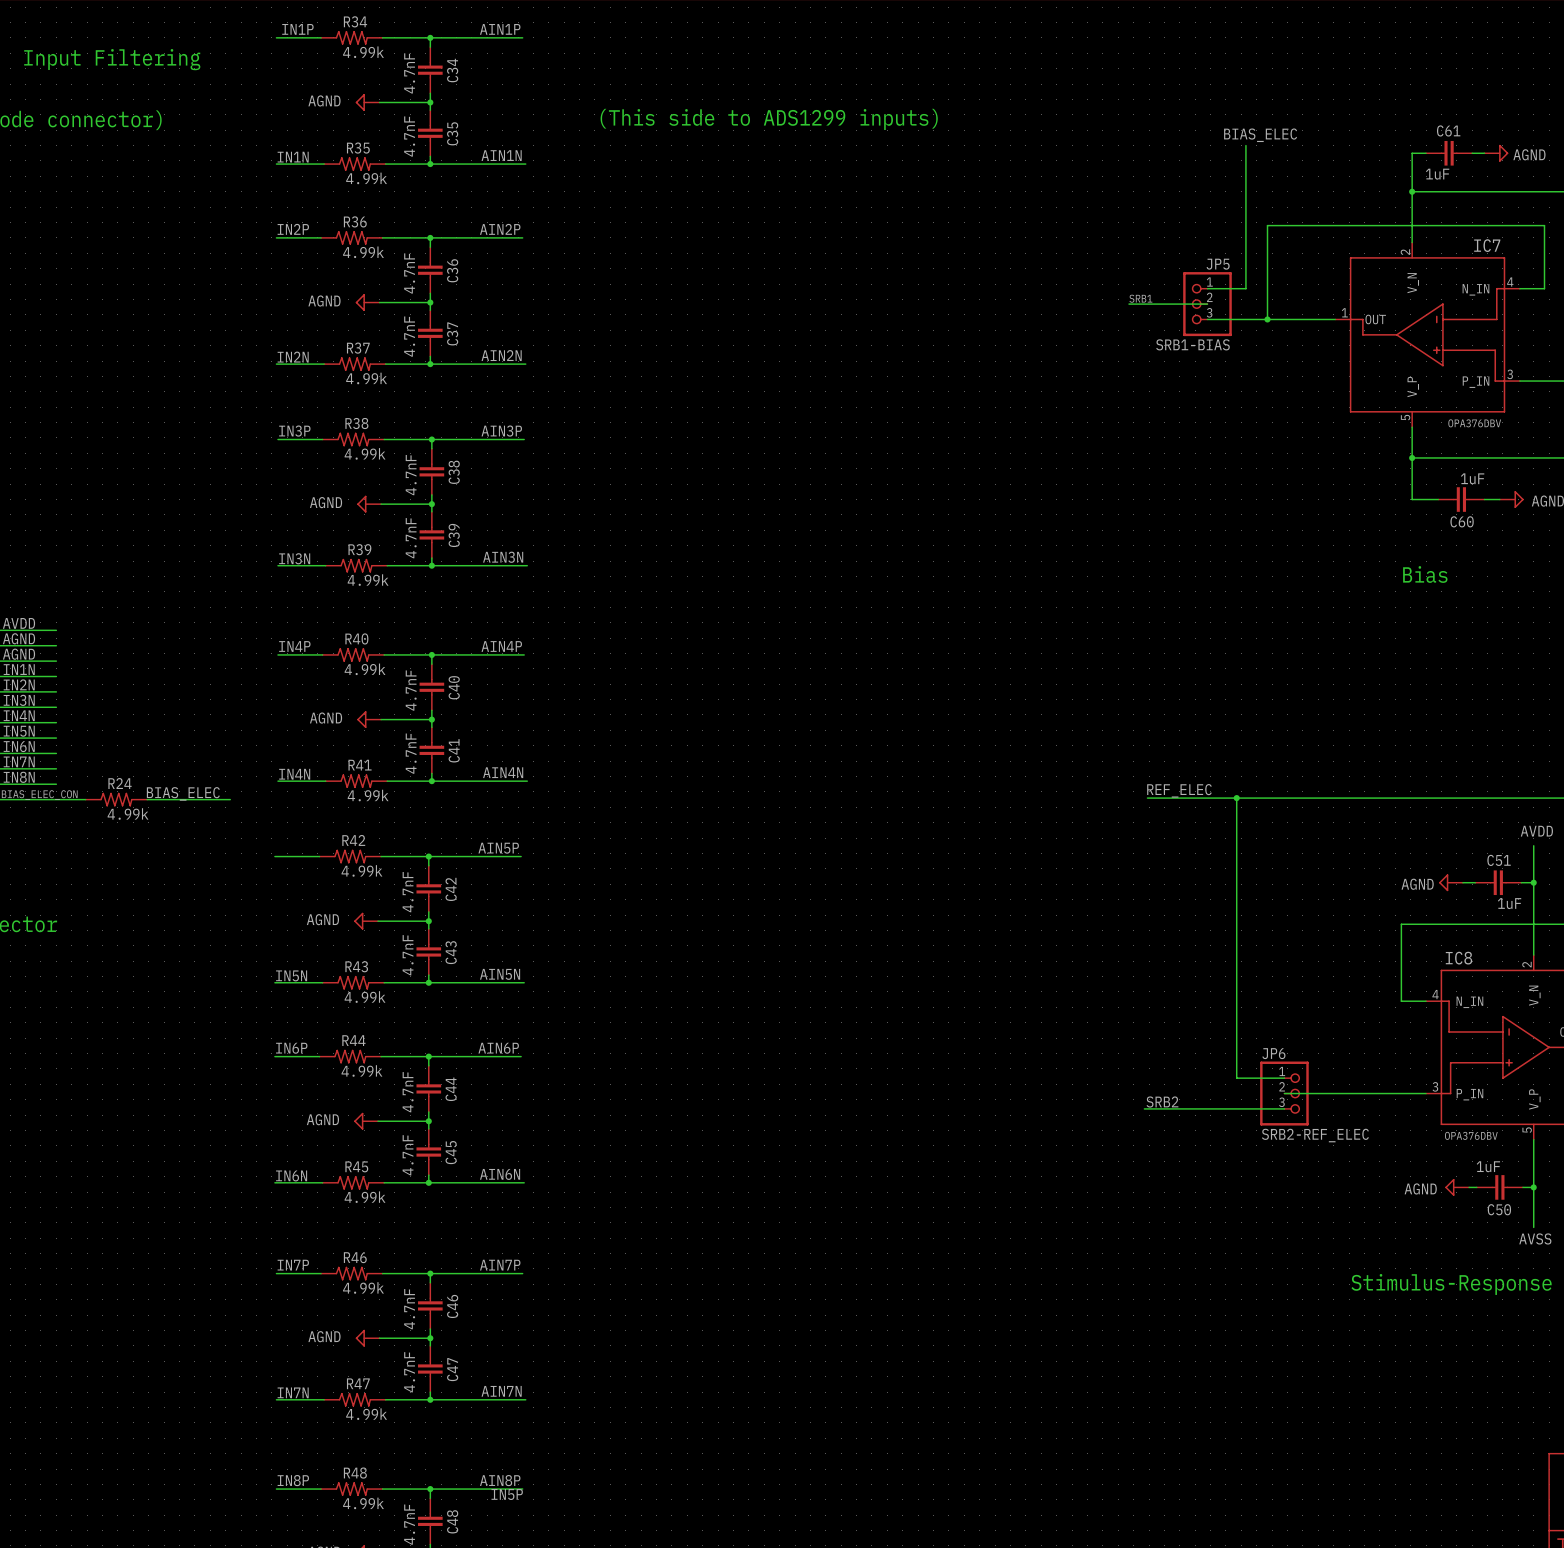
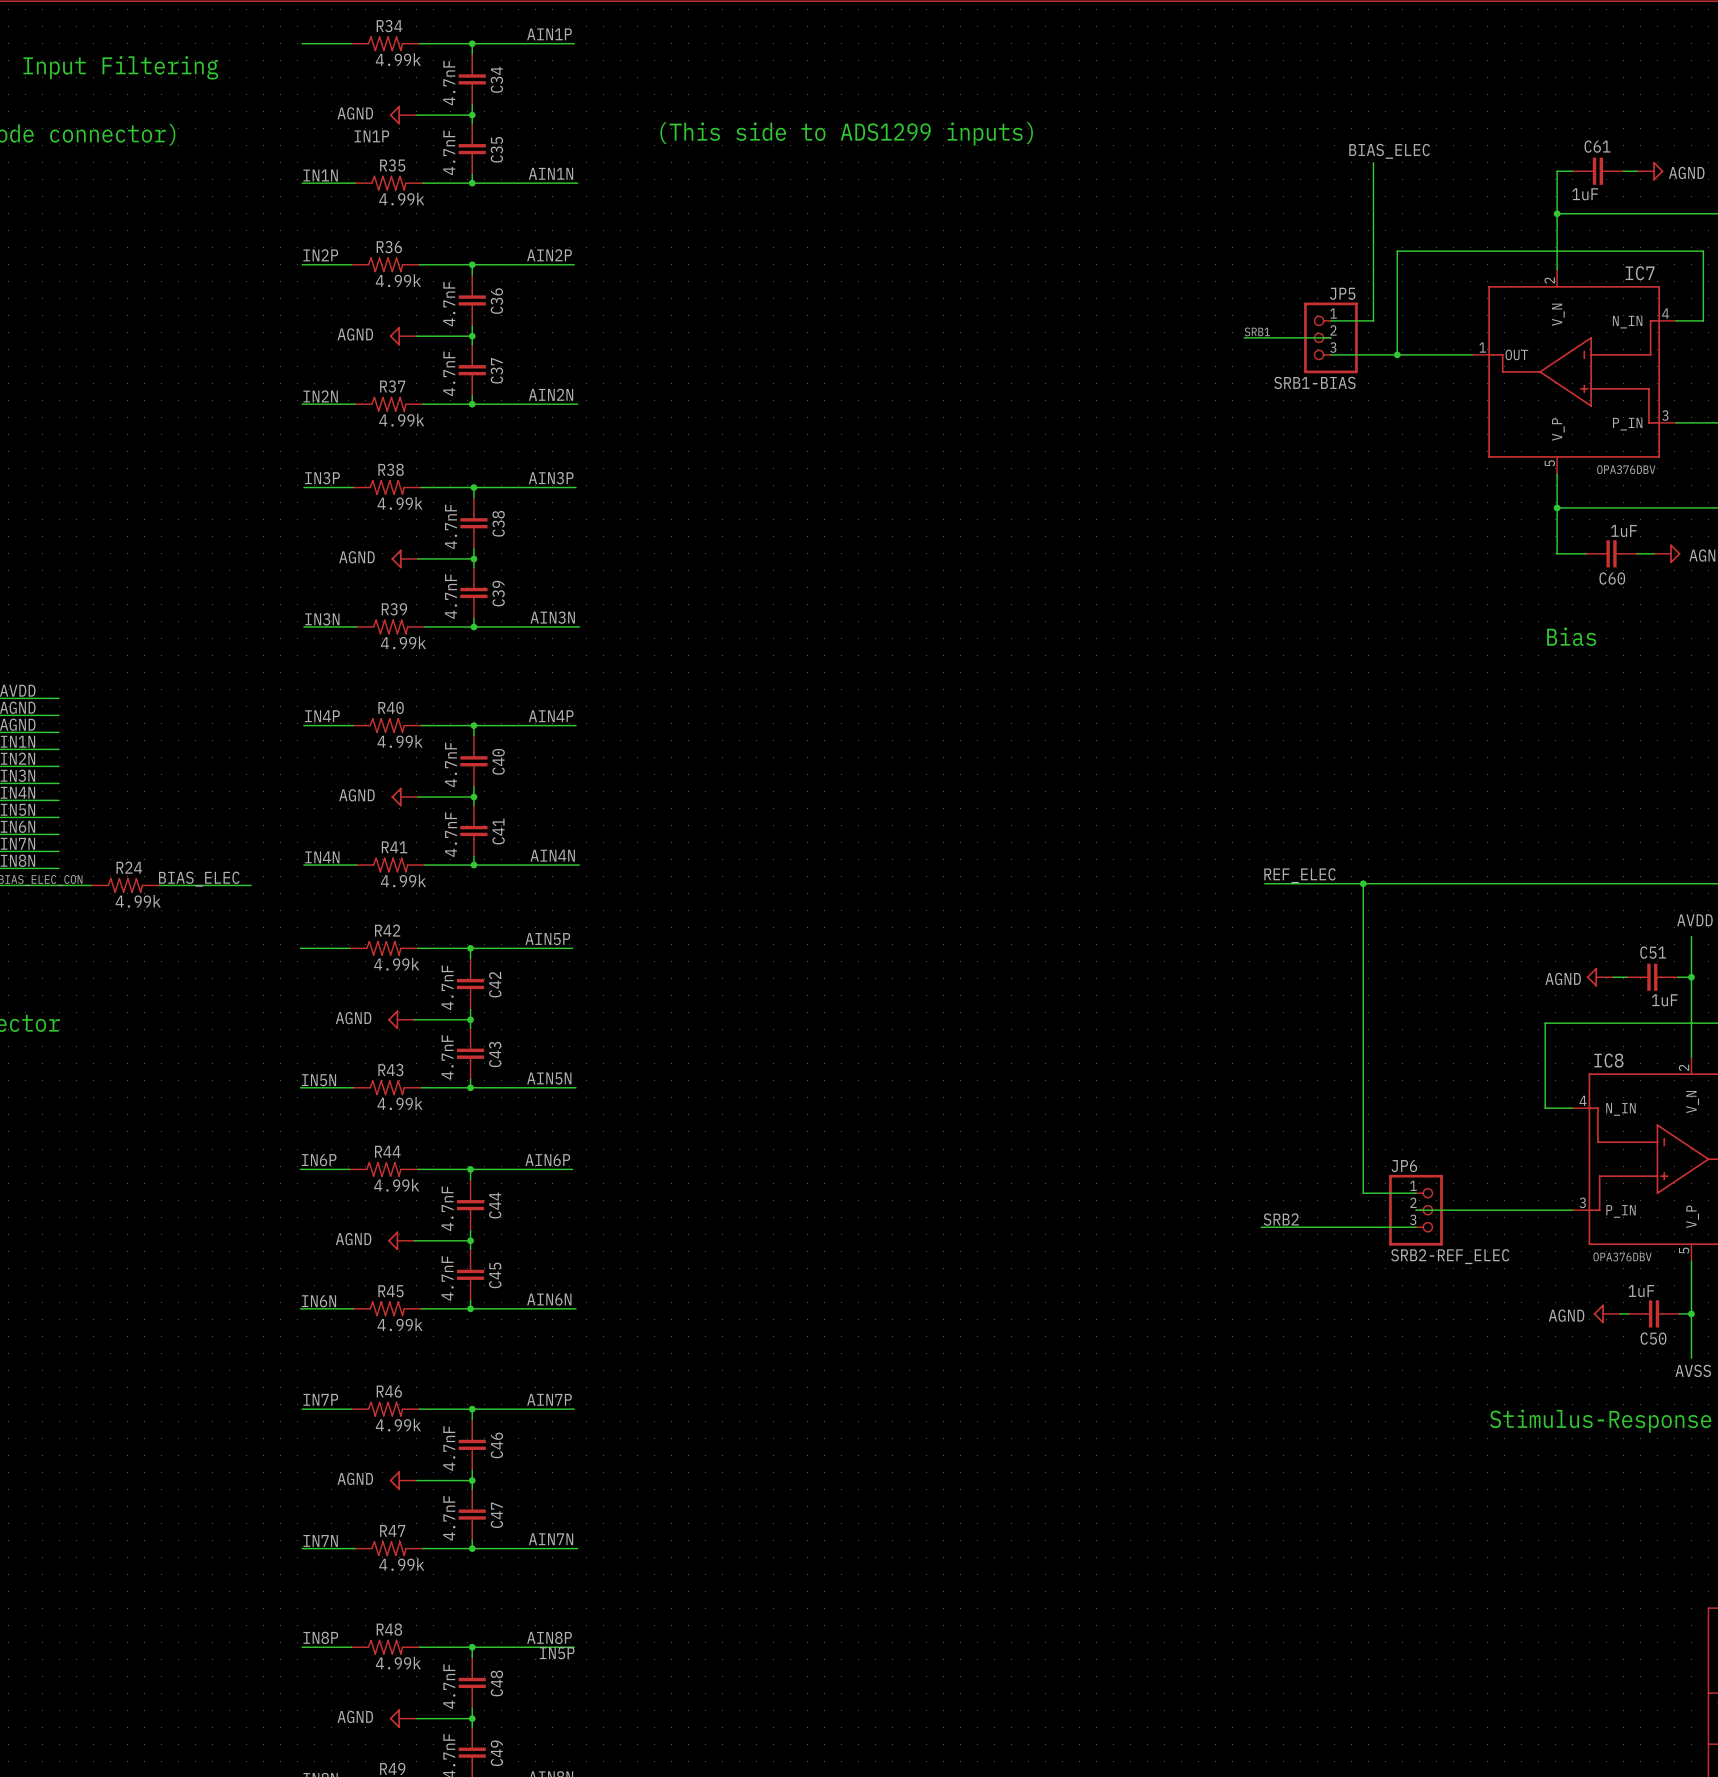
label position: IN1P (297, 29) -> IN1P (371, 136)

